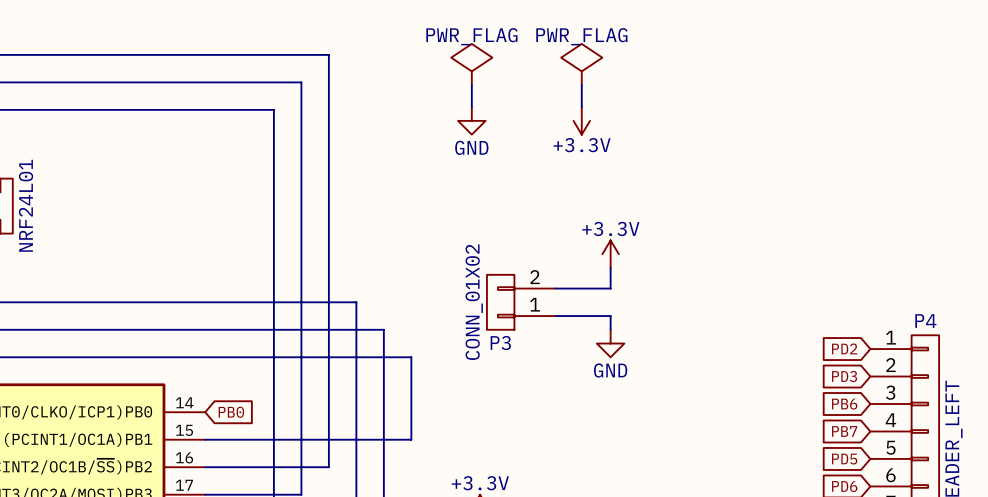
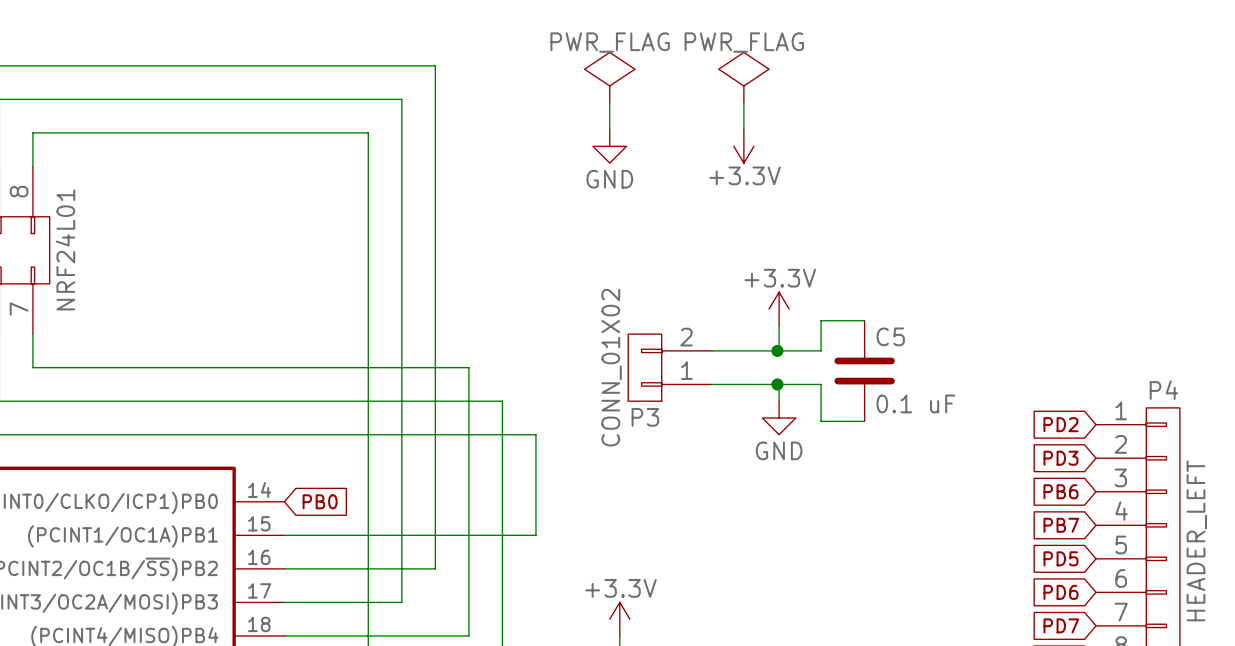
wire: none -> (864, 320) (821, 320) (821, 350) (779, 350)
junction: none -> (777, 350)
C5: none -> 0.1 uF (864, 371)
junction: none -> (777, 384)
wire: none -> (779, 384) (821, 384) (821, 421) (864, 421)

